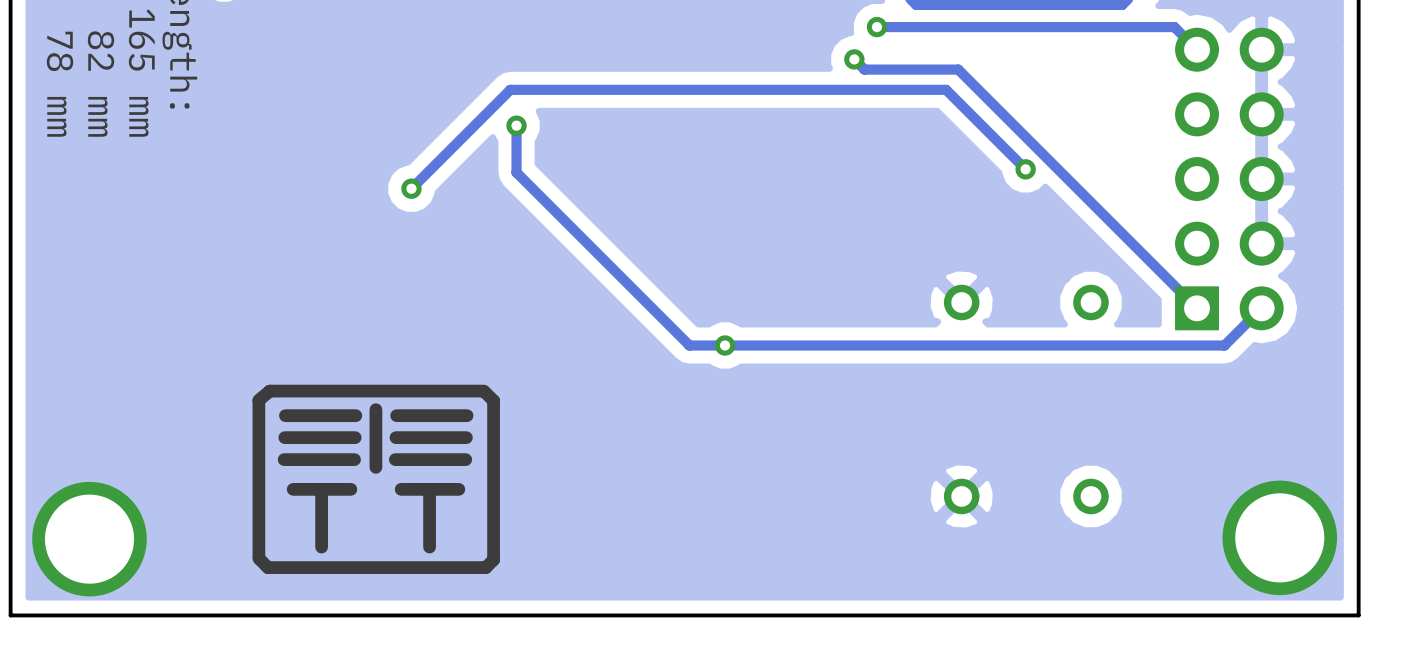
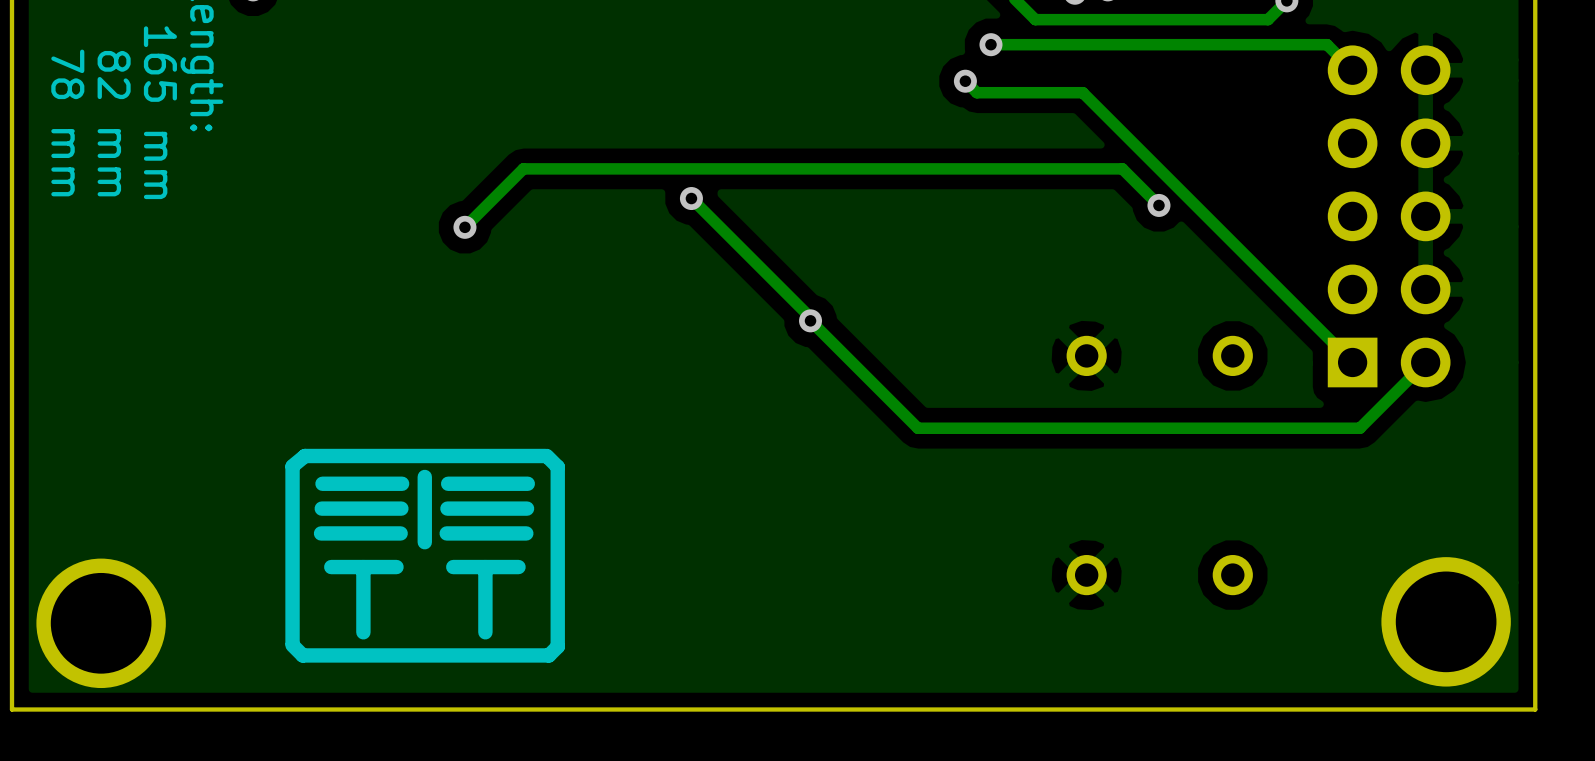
track: (516, 125) (516, 172) (689, 345) (1224, 345) -> (691, 198) (917, 428) (1359, 428) (1383, 404)
via position: (516, 125) -> (691, 198)
track: (993, 136) (946, 89) (510, 89) (463, 136) -> (1122, 168) (523, 168)
via position: (725, 345) -> (810, 320)

